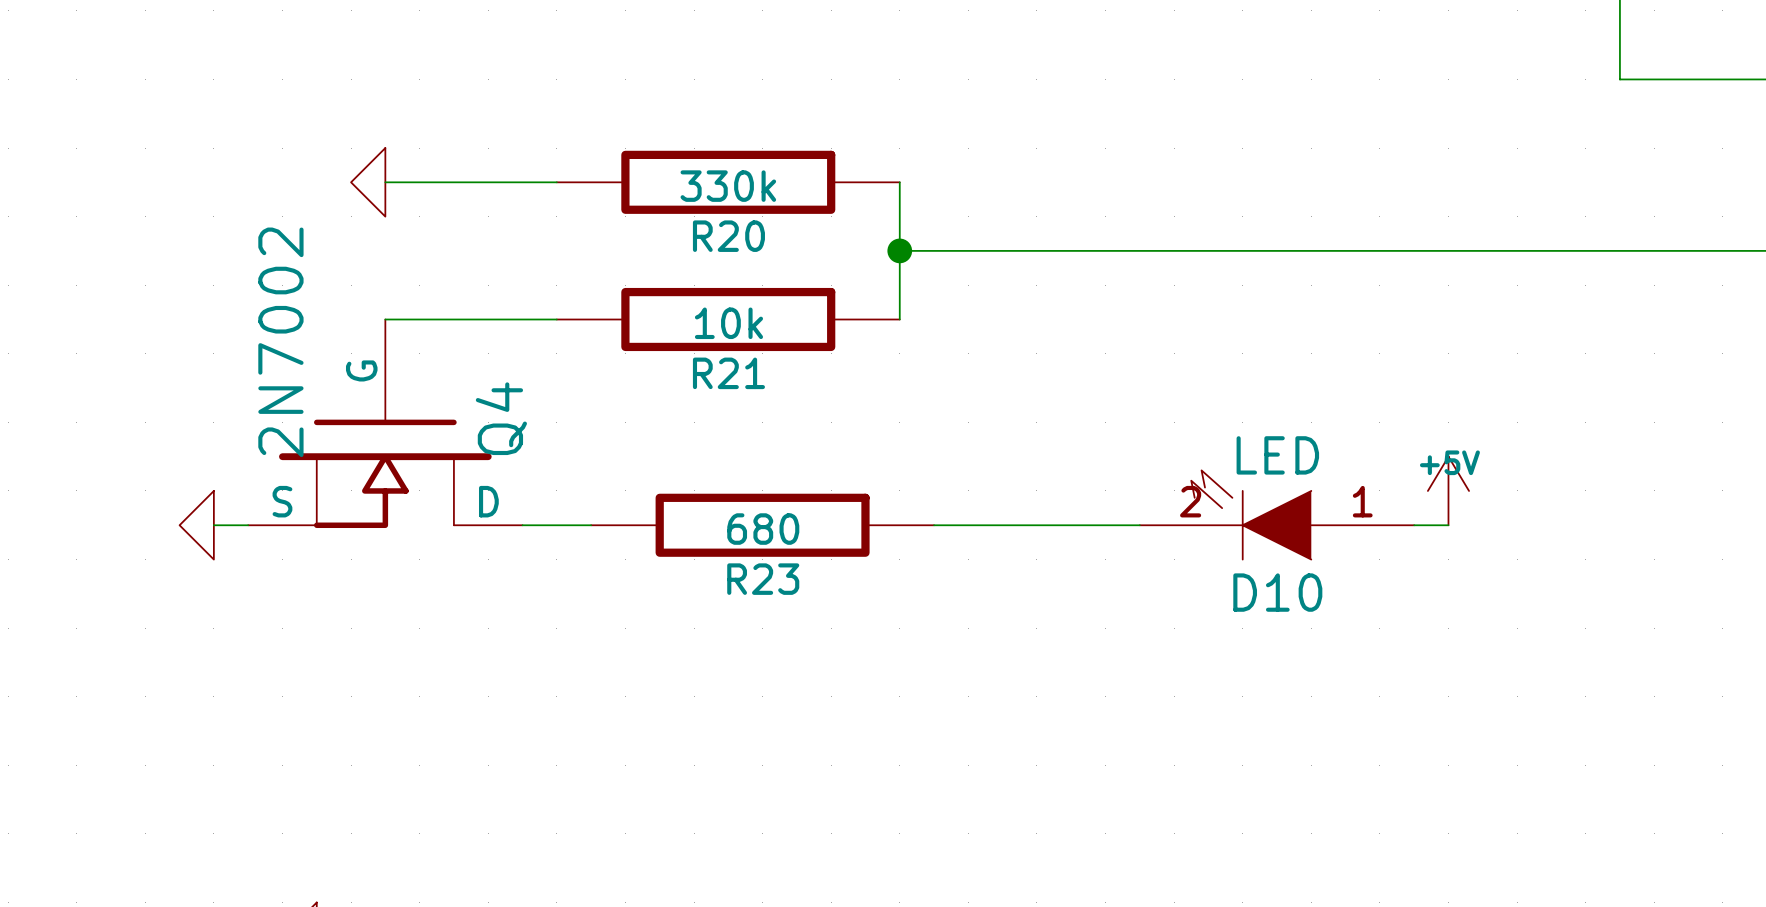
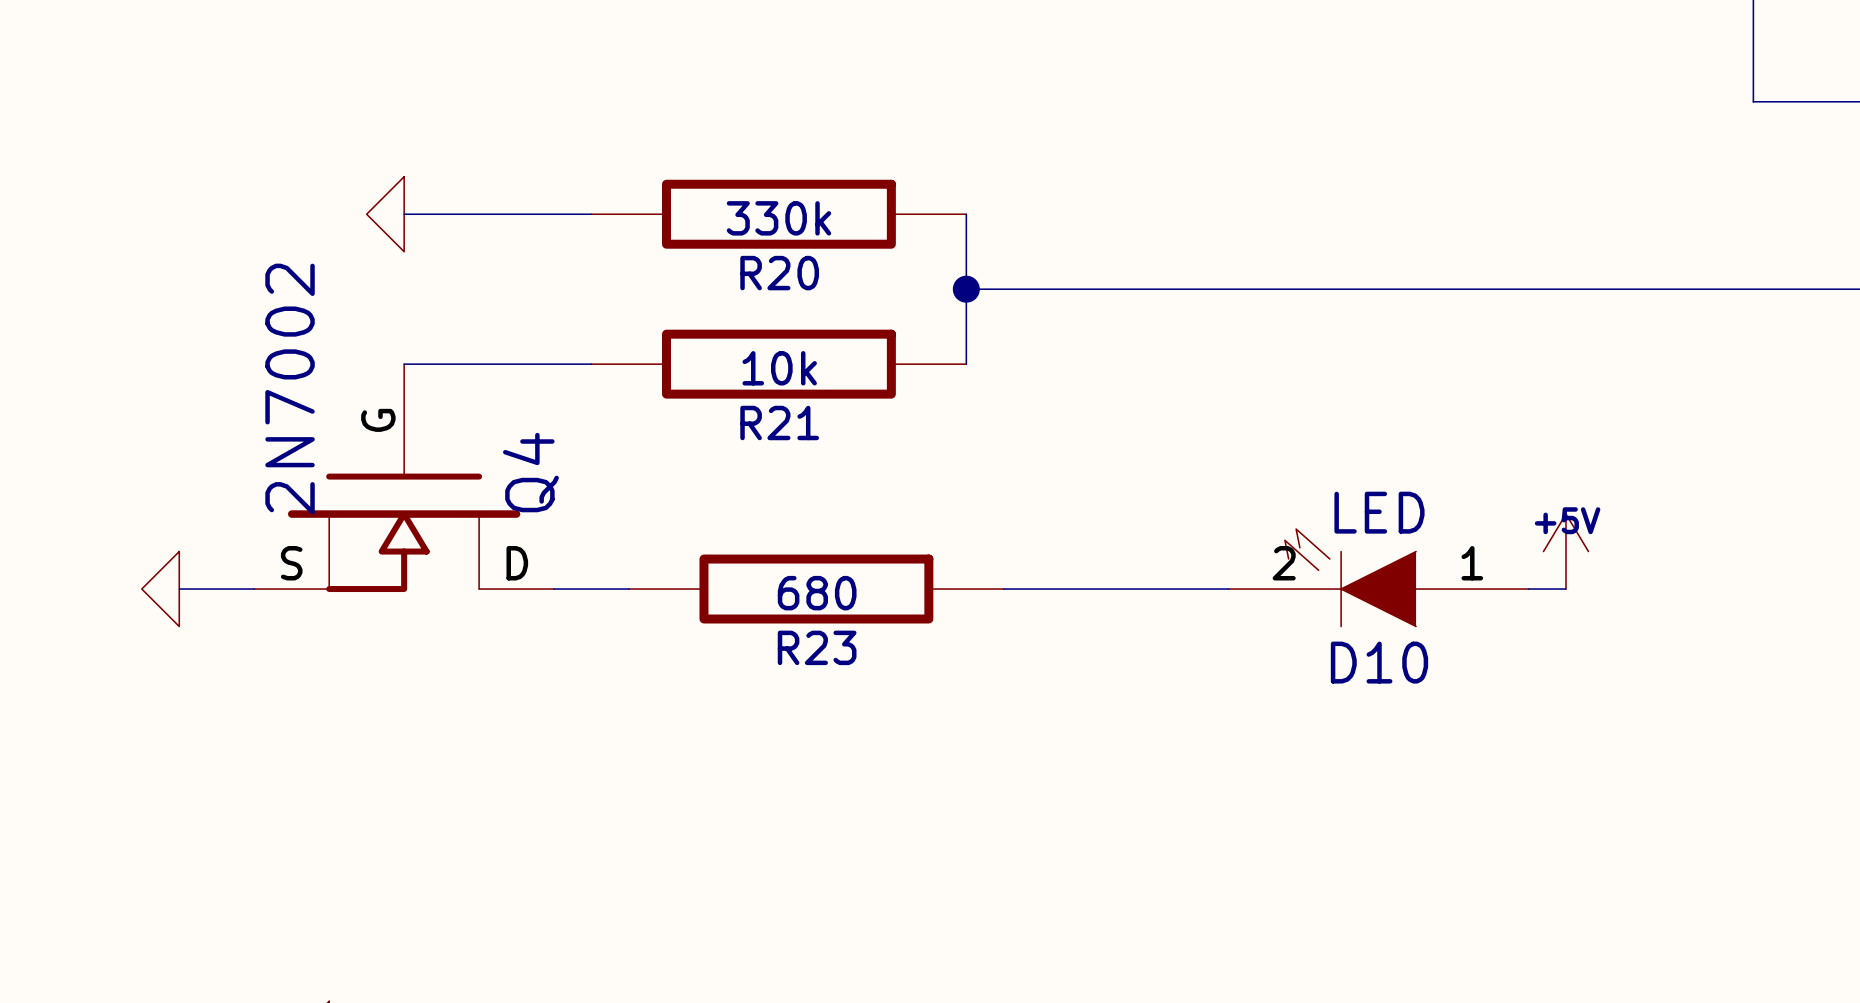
wire: none -> (179, 589) (216, 589)
power symbol position: (196, 525) -> (160, 589)

